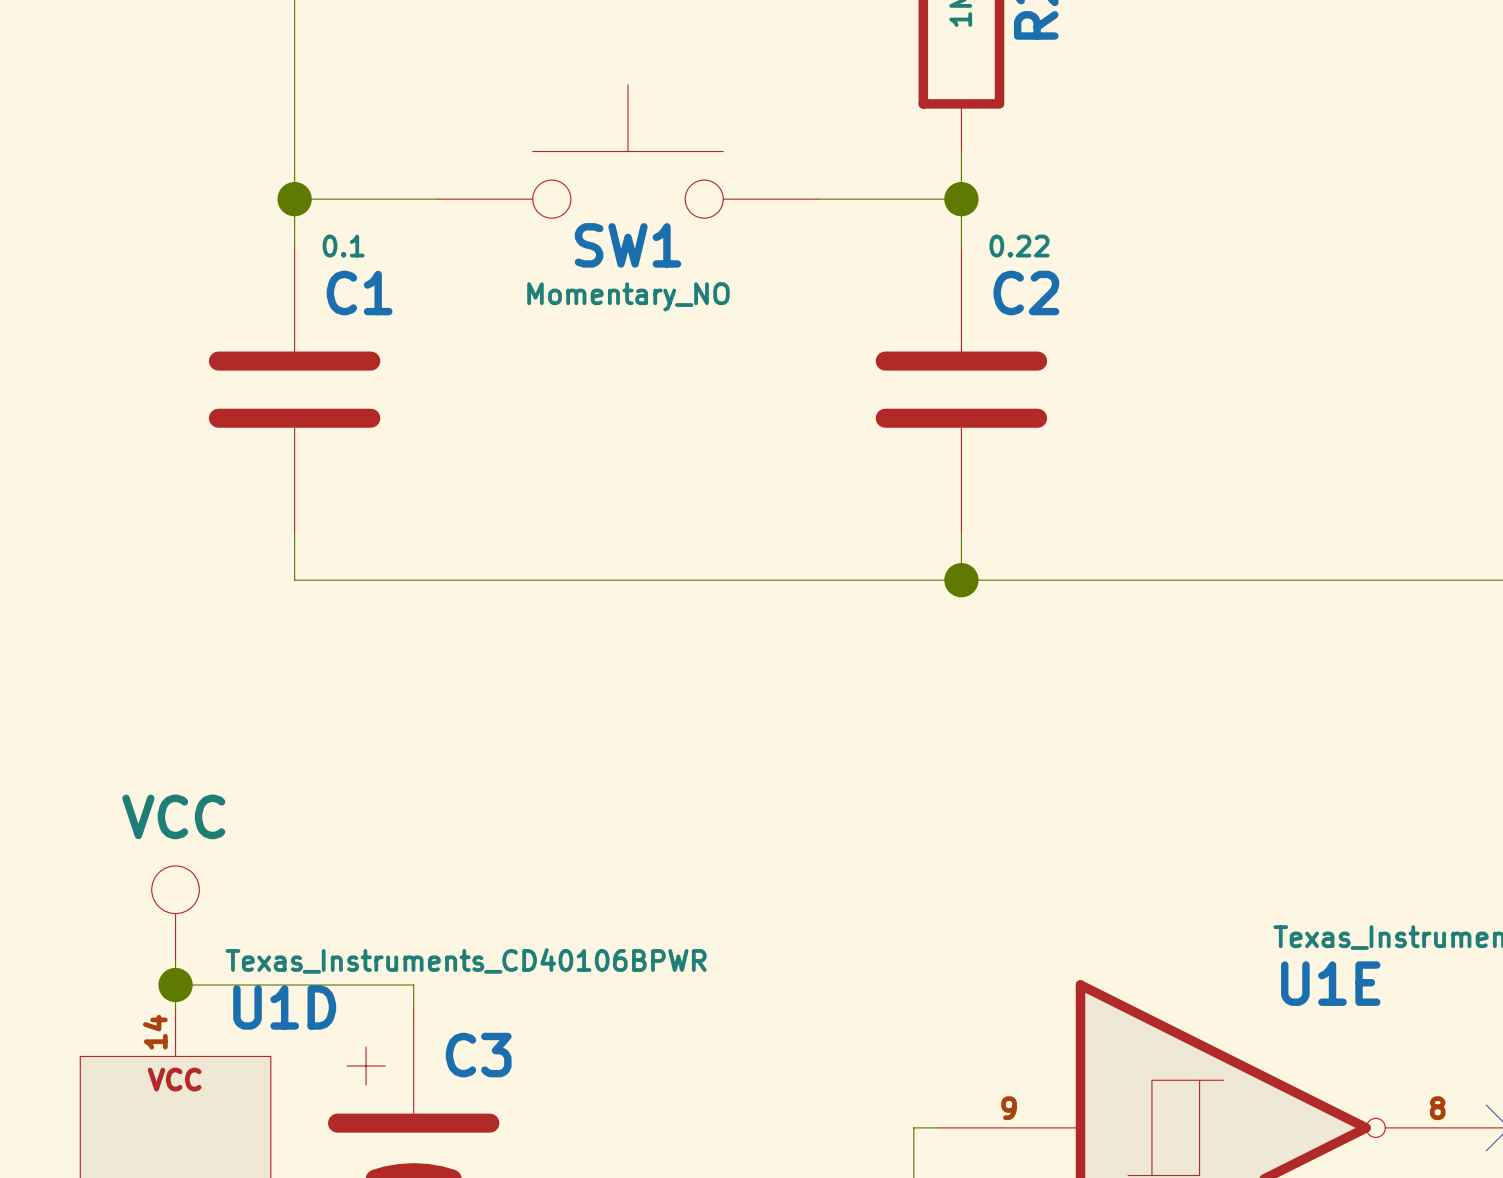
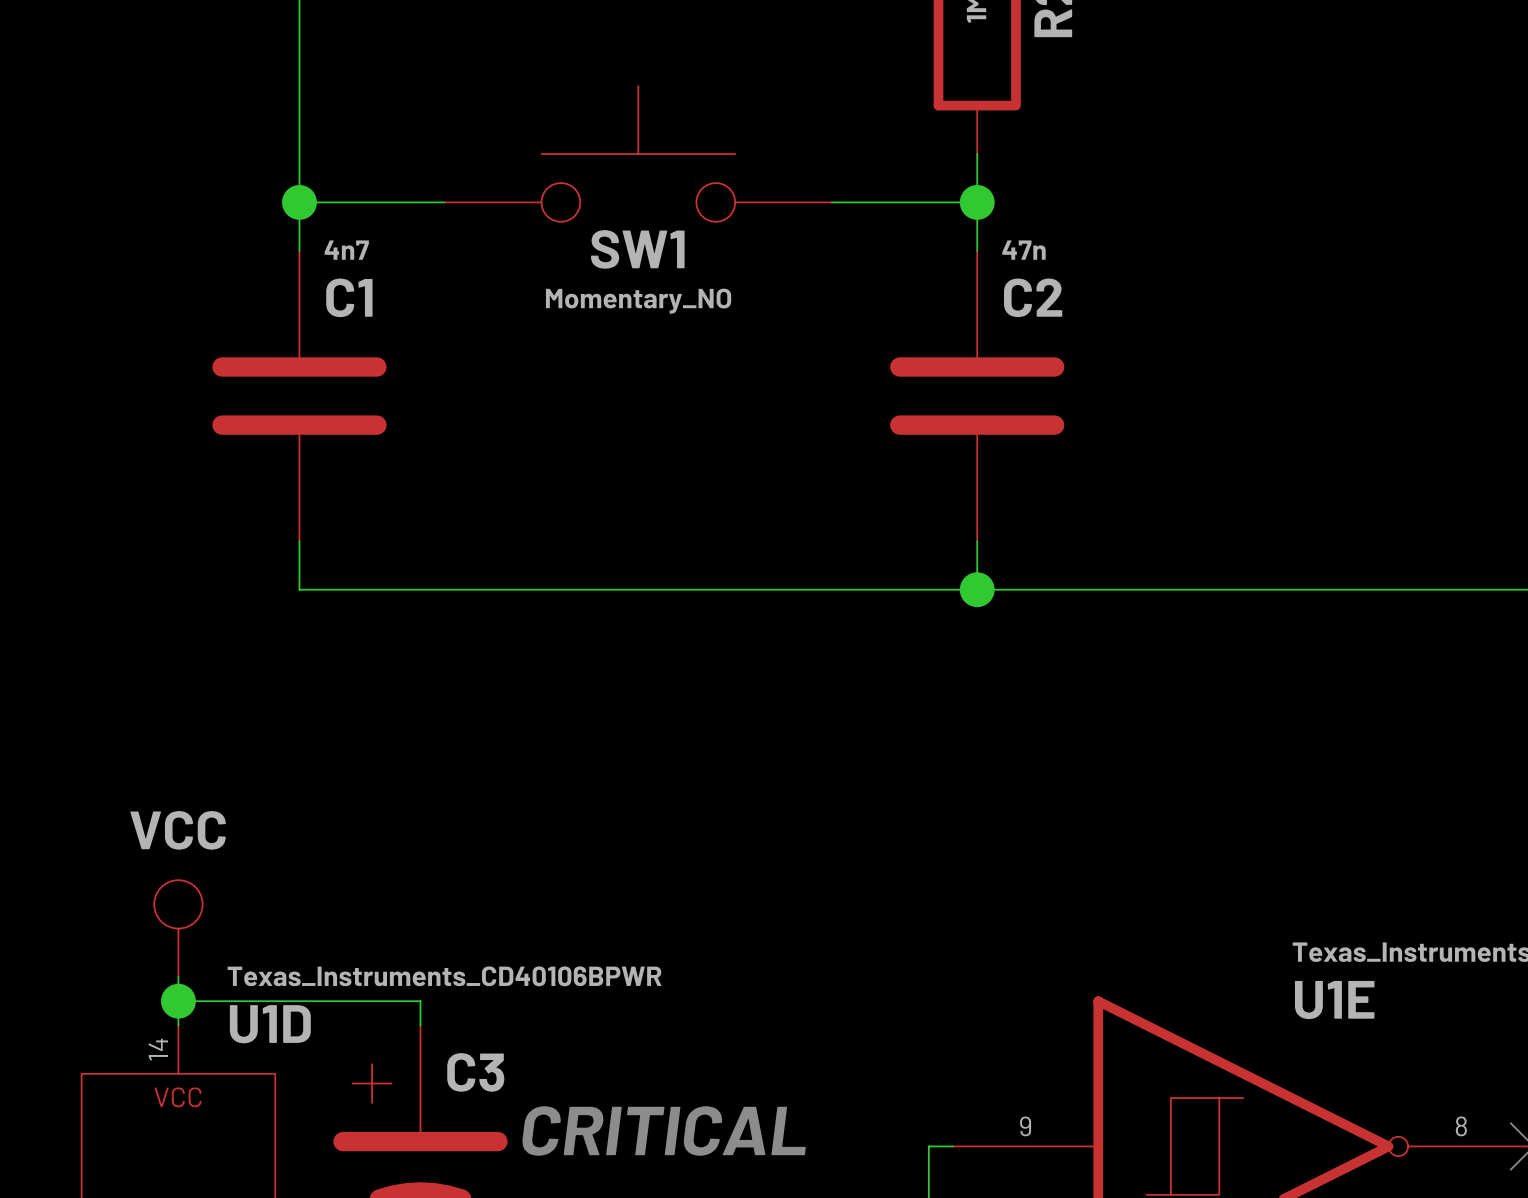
C1 value: 0.1 (343, 246) -> 4n7 (346, 250)
C2 value: 0.22 (1019, 246) -> 47n (1024, 250)
text: none -> CRITICAL (663, 1130)

